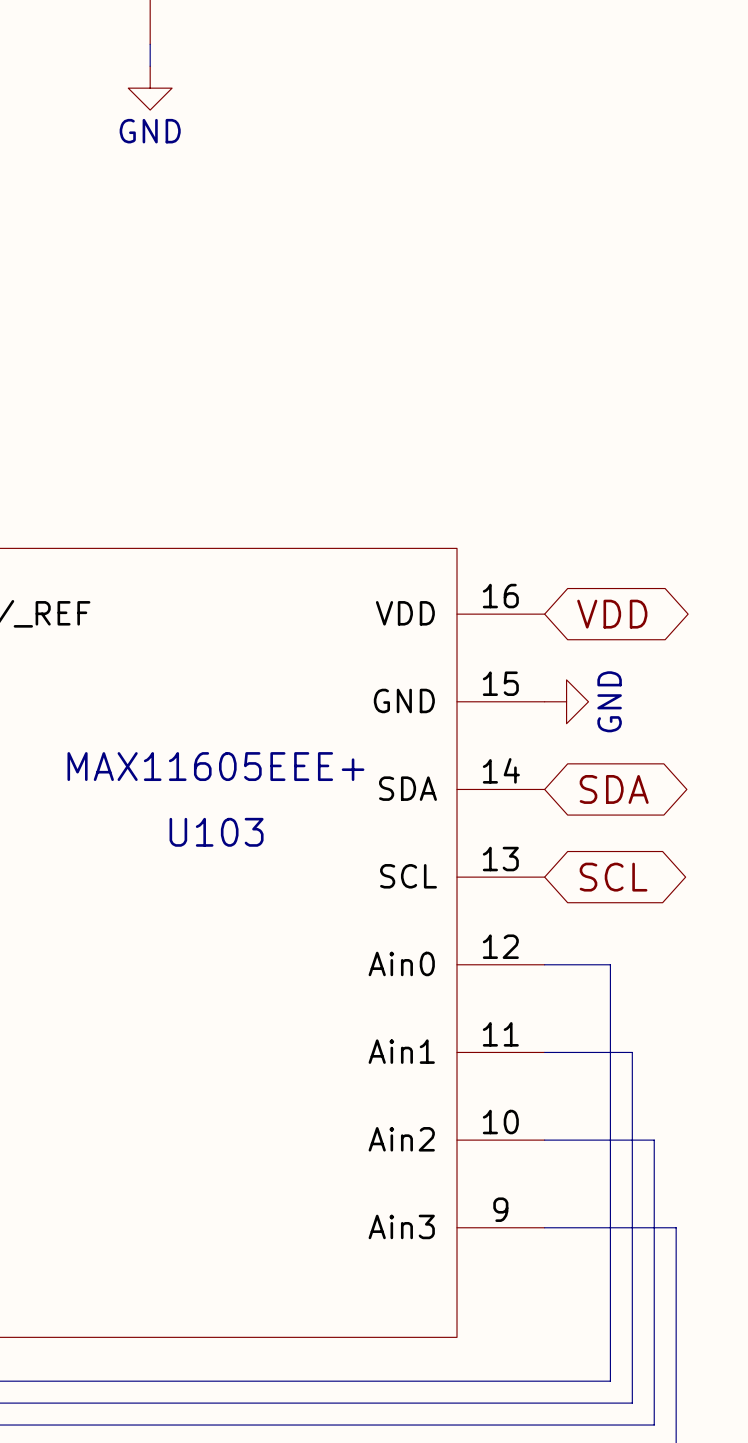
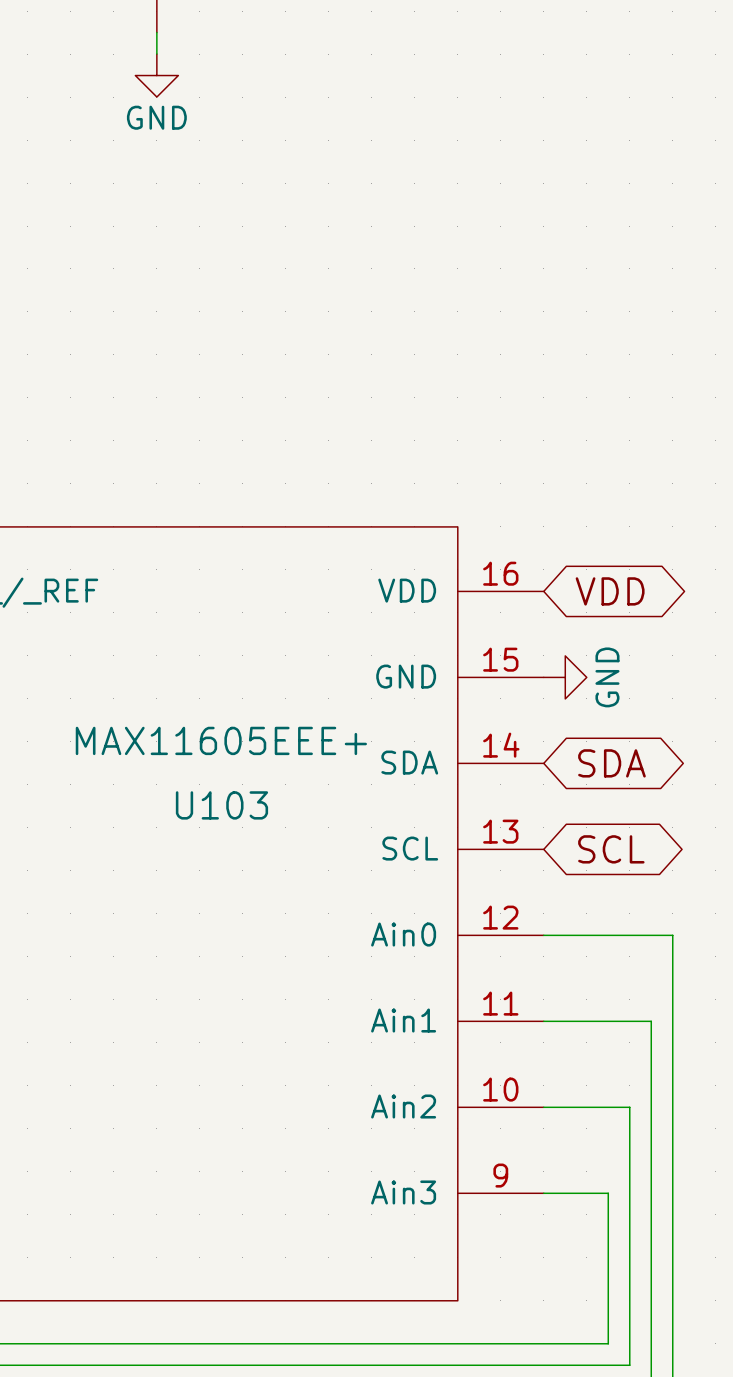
wire: (610, 964) (610, 1227) (676, 1227) -> (608, 935) (672, 935) (672, 1193)
wire: (632, 1052) (632, 1140) (654, 1140) -> (629, 1021) (651, 1021) (651, 1107)

